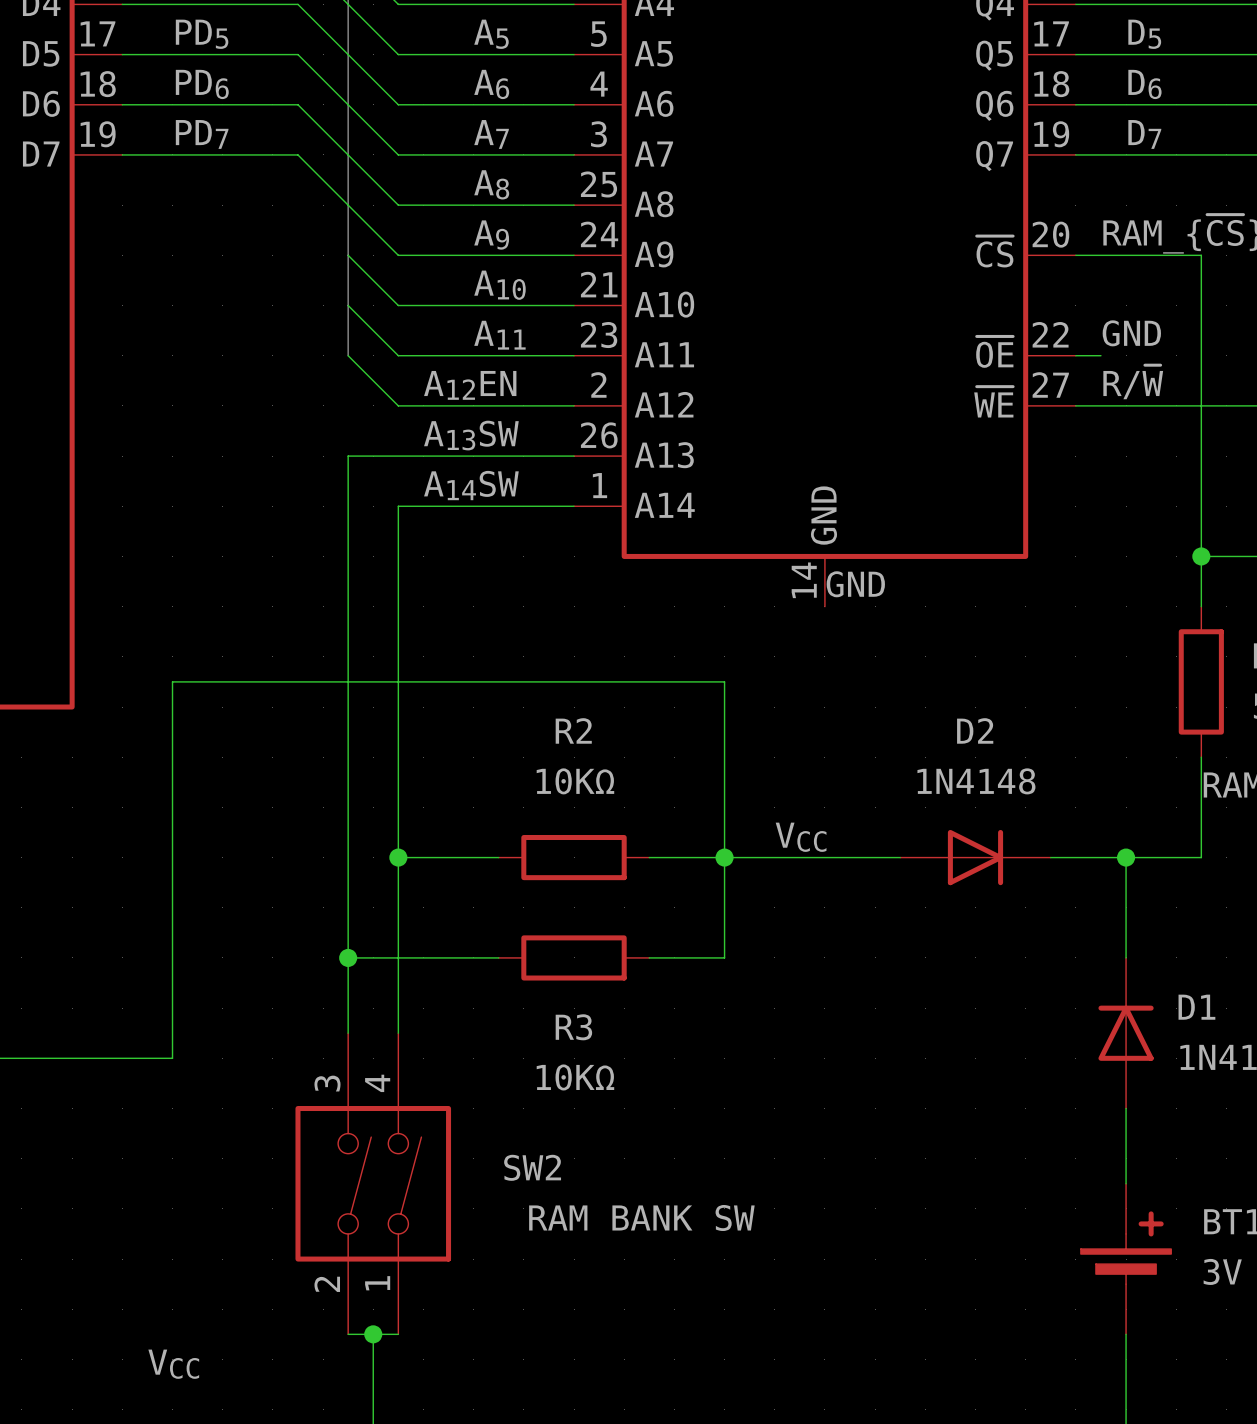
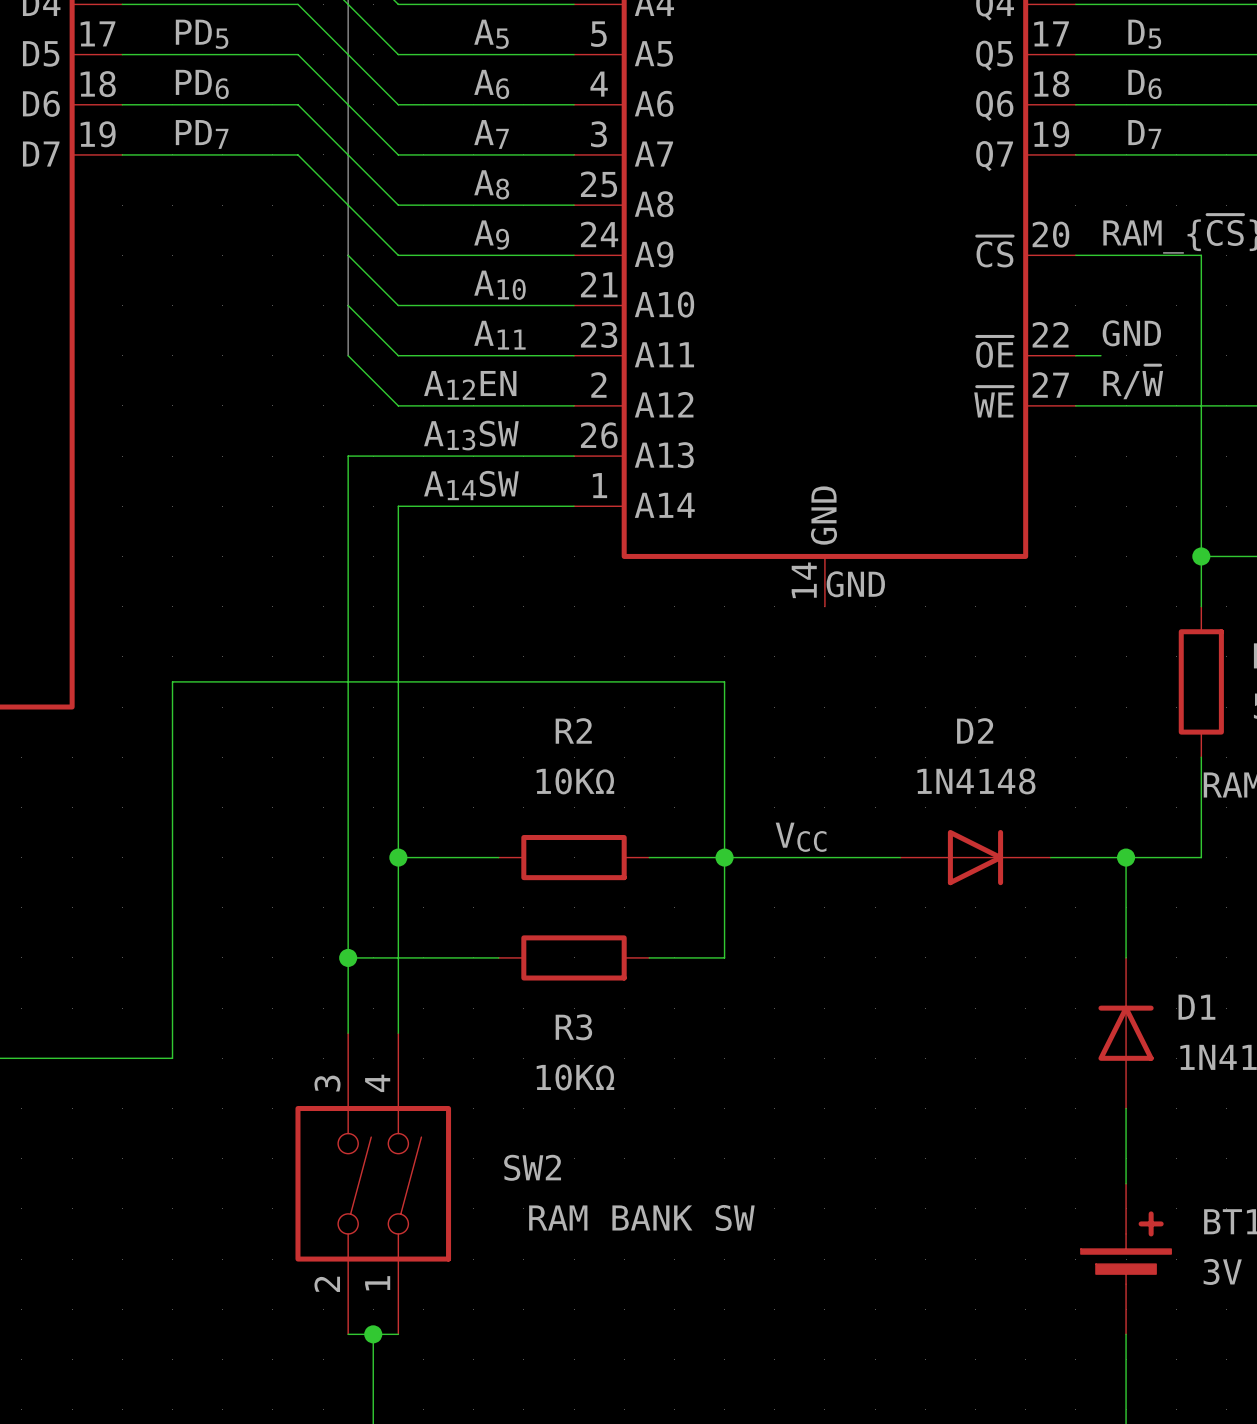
label: VCC (173, 1364) -> none

